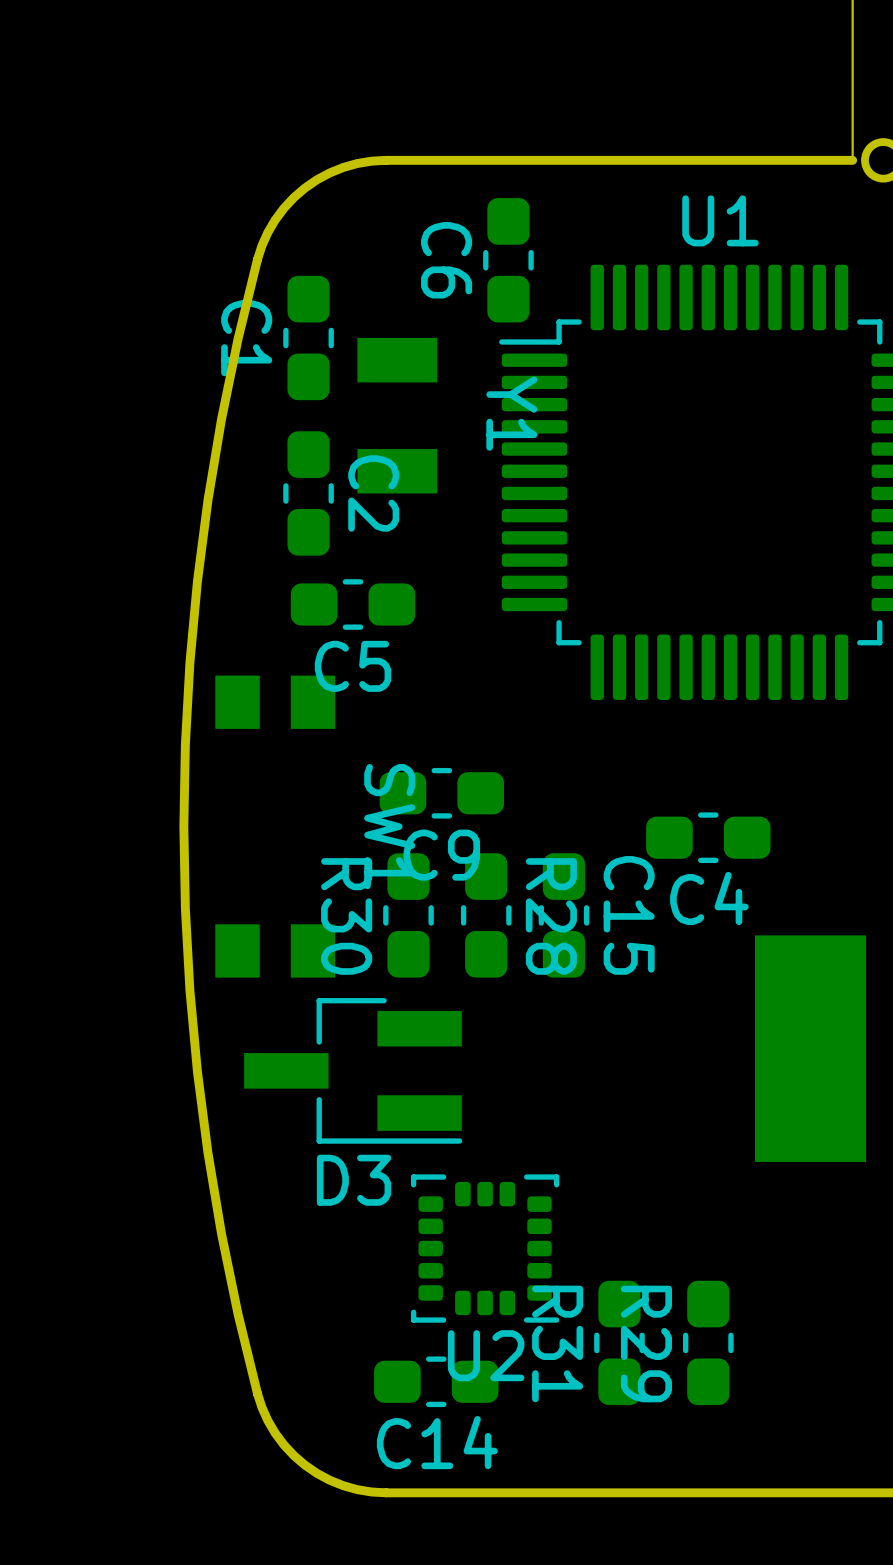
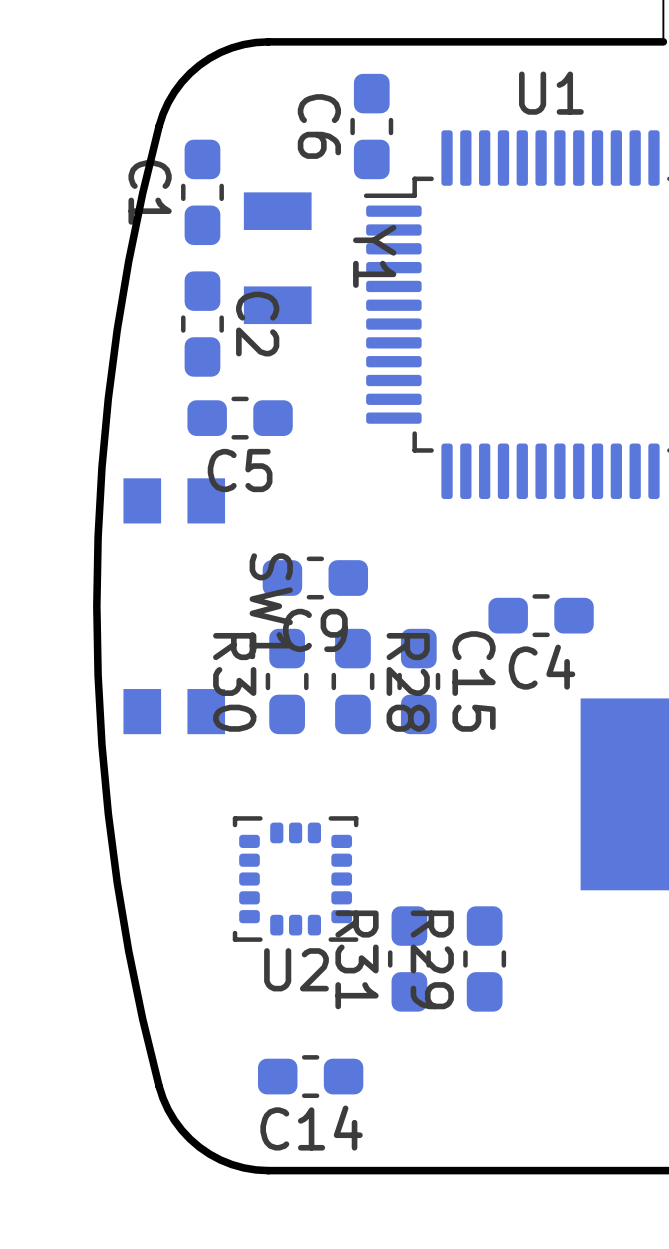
D3: (353, 1070) -> none
U2 position: (485, 1248) -> (295, 879)
R31 position: (619, 1342) -> (409, 958)
R29 position: (708, 1342) -> (484, 958)

